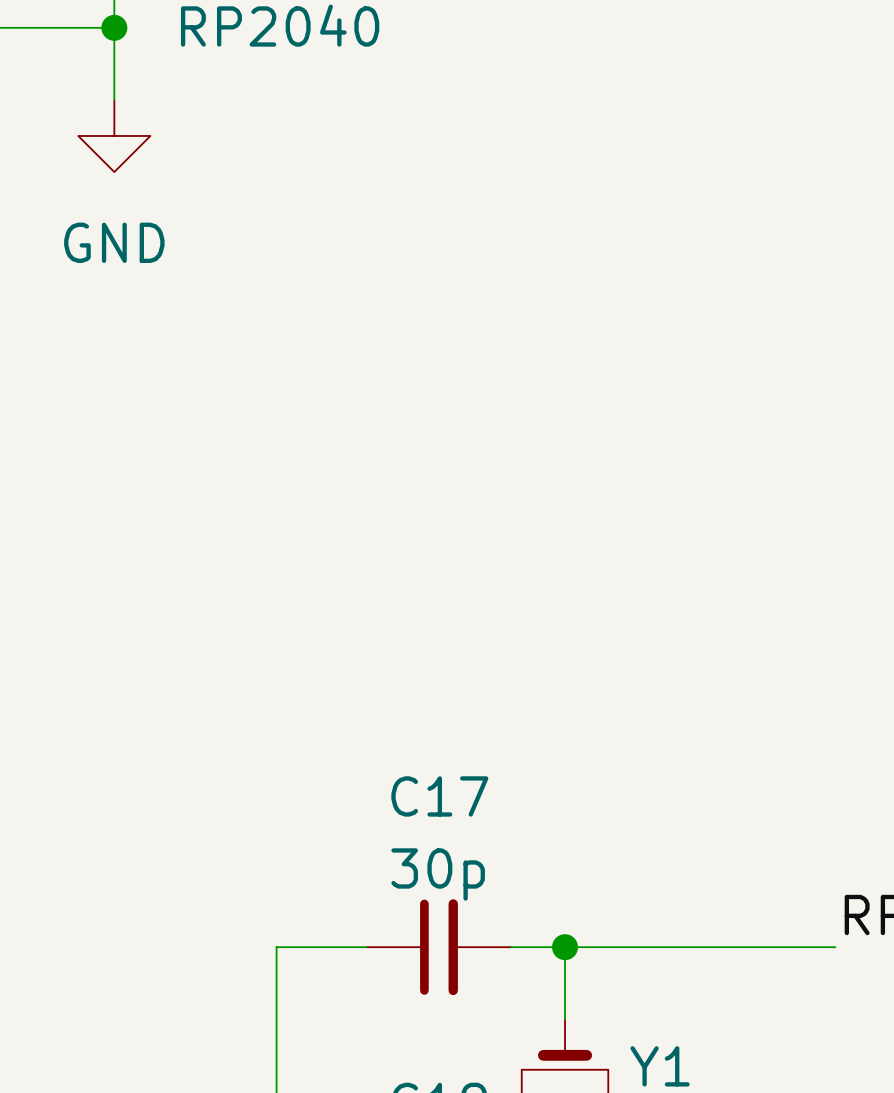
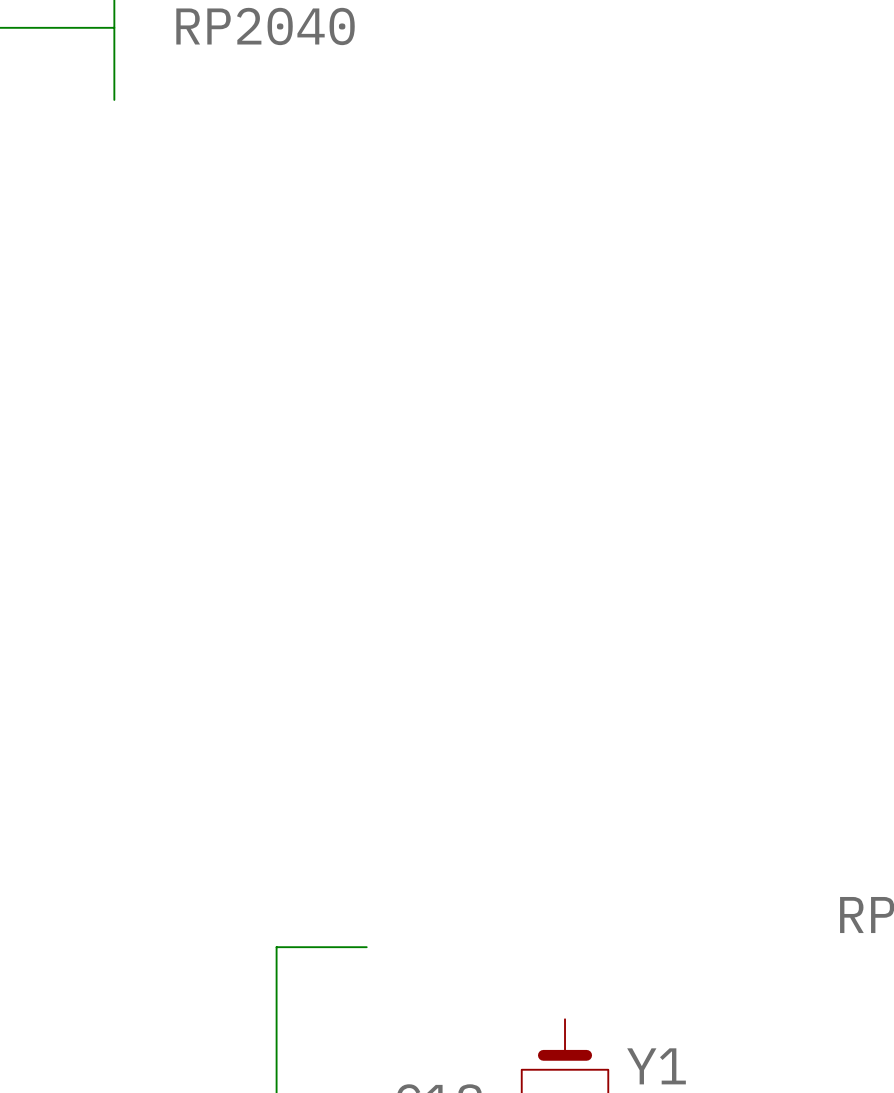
junction: (114, 27) -> none
power symbol: GND (114, 135) -> none
C17: 30p (438, 947) -> none
wire: (510, 947) (835, 947) -> none
wire: (565, 947) (565, 1019) -> none
junction: (565, 947) -> none

